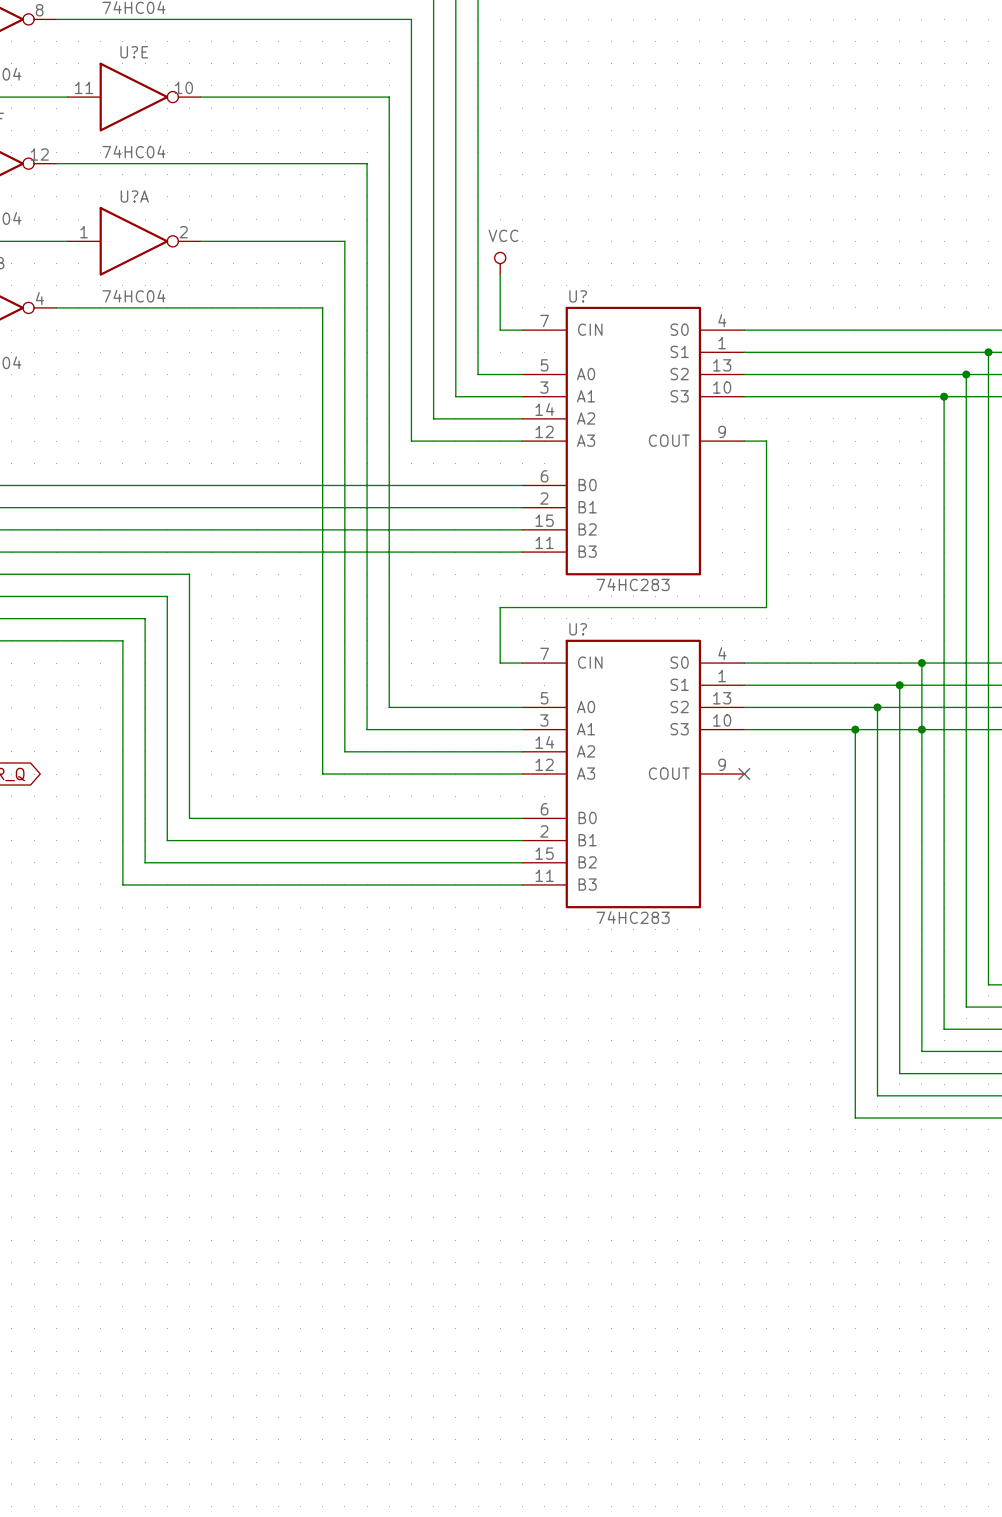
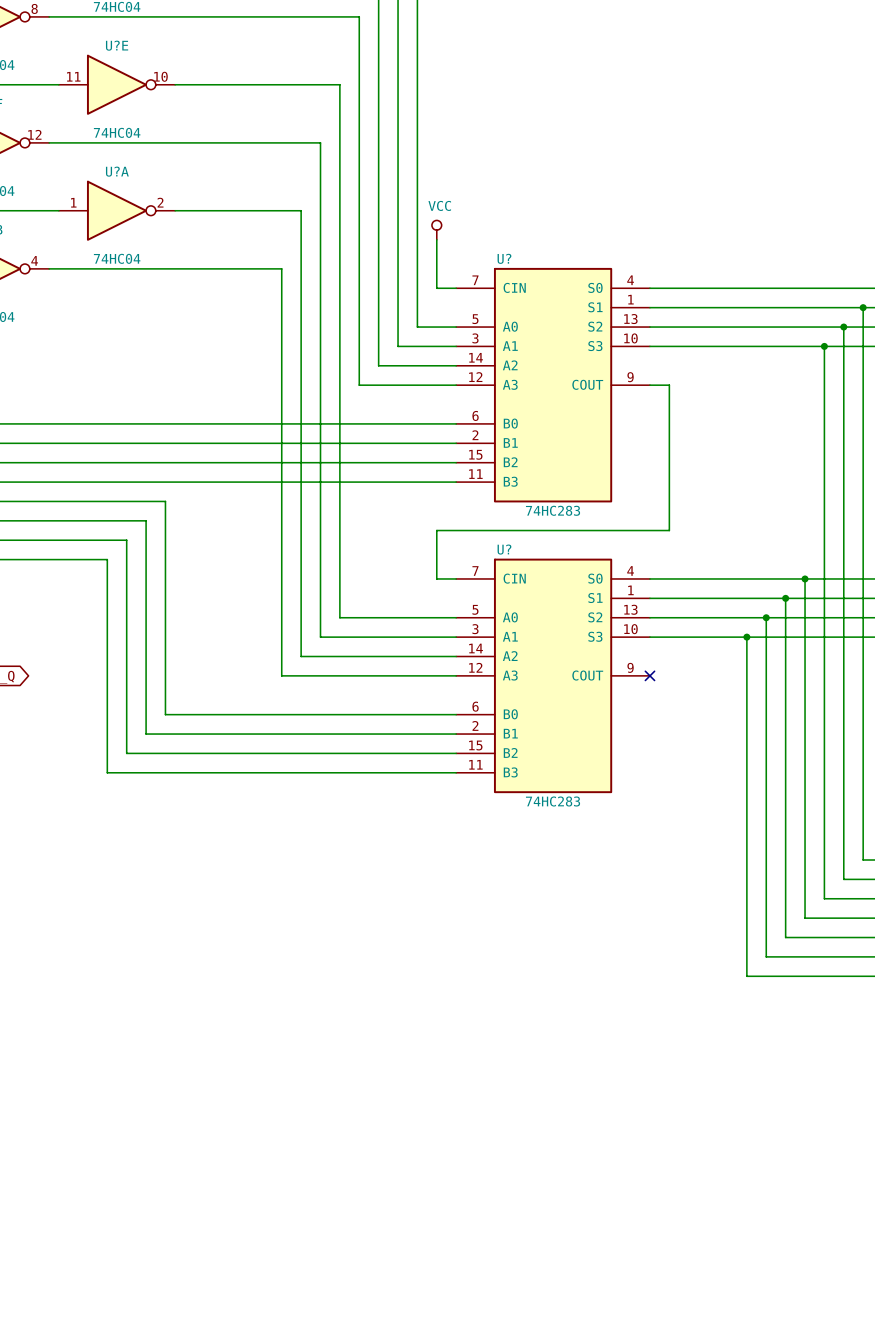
junction: (921, 729) -> none

